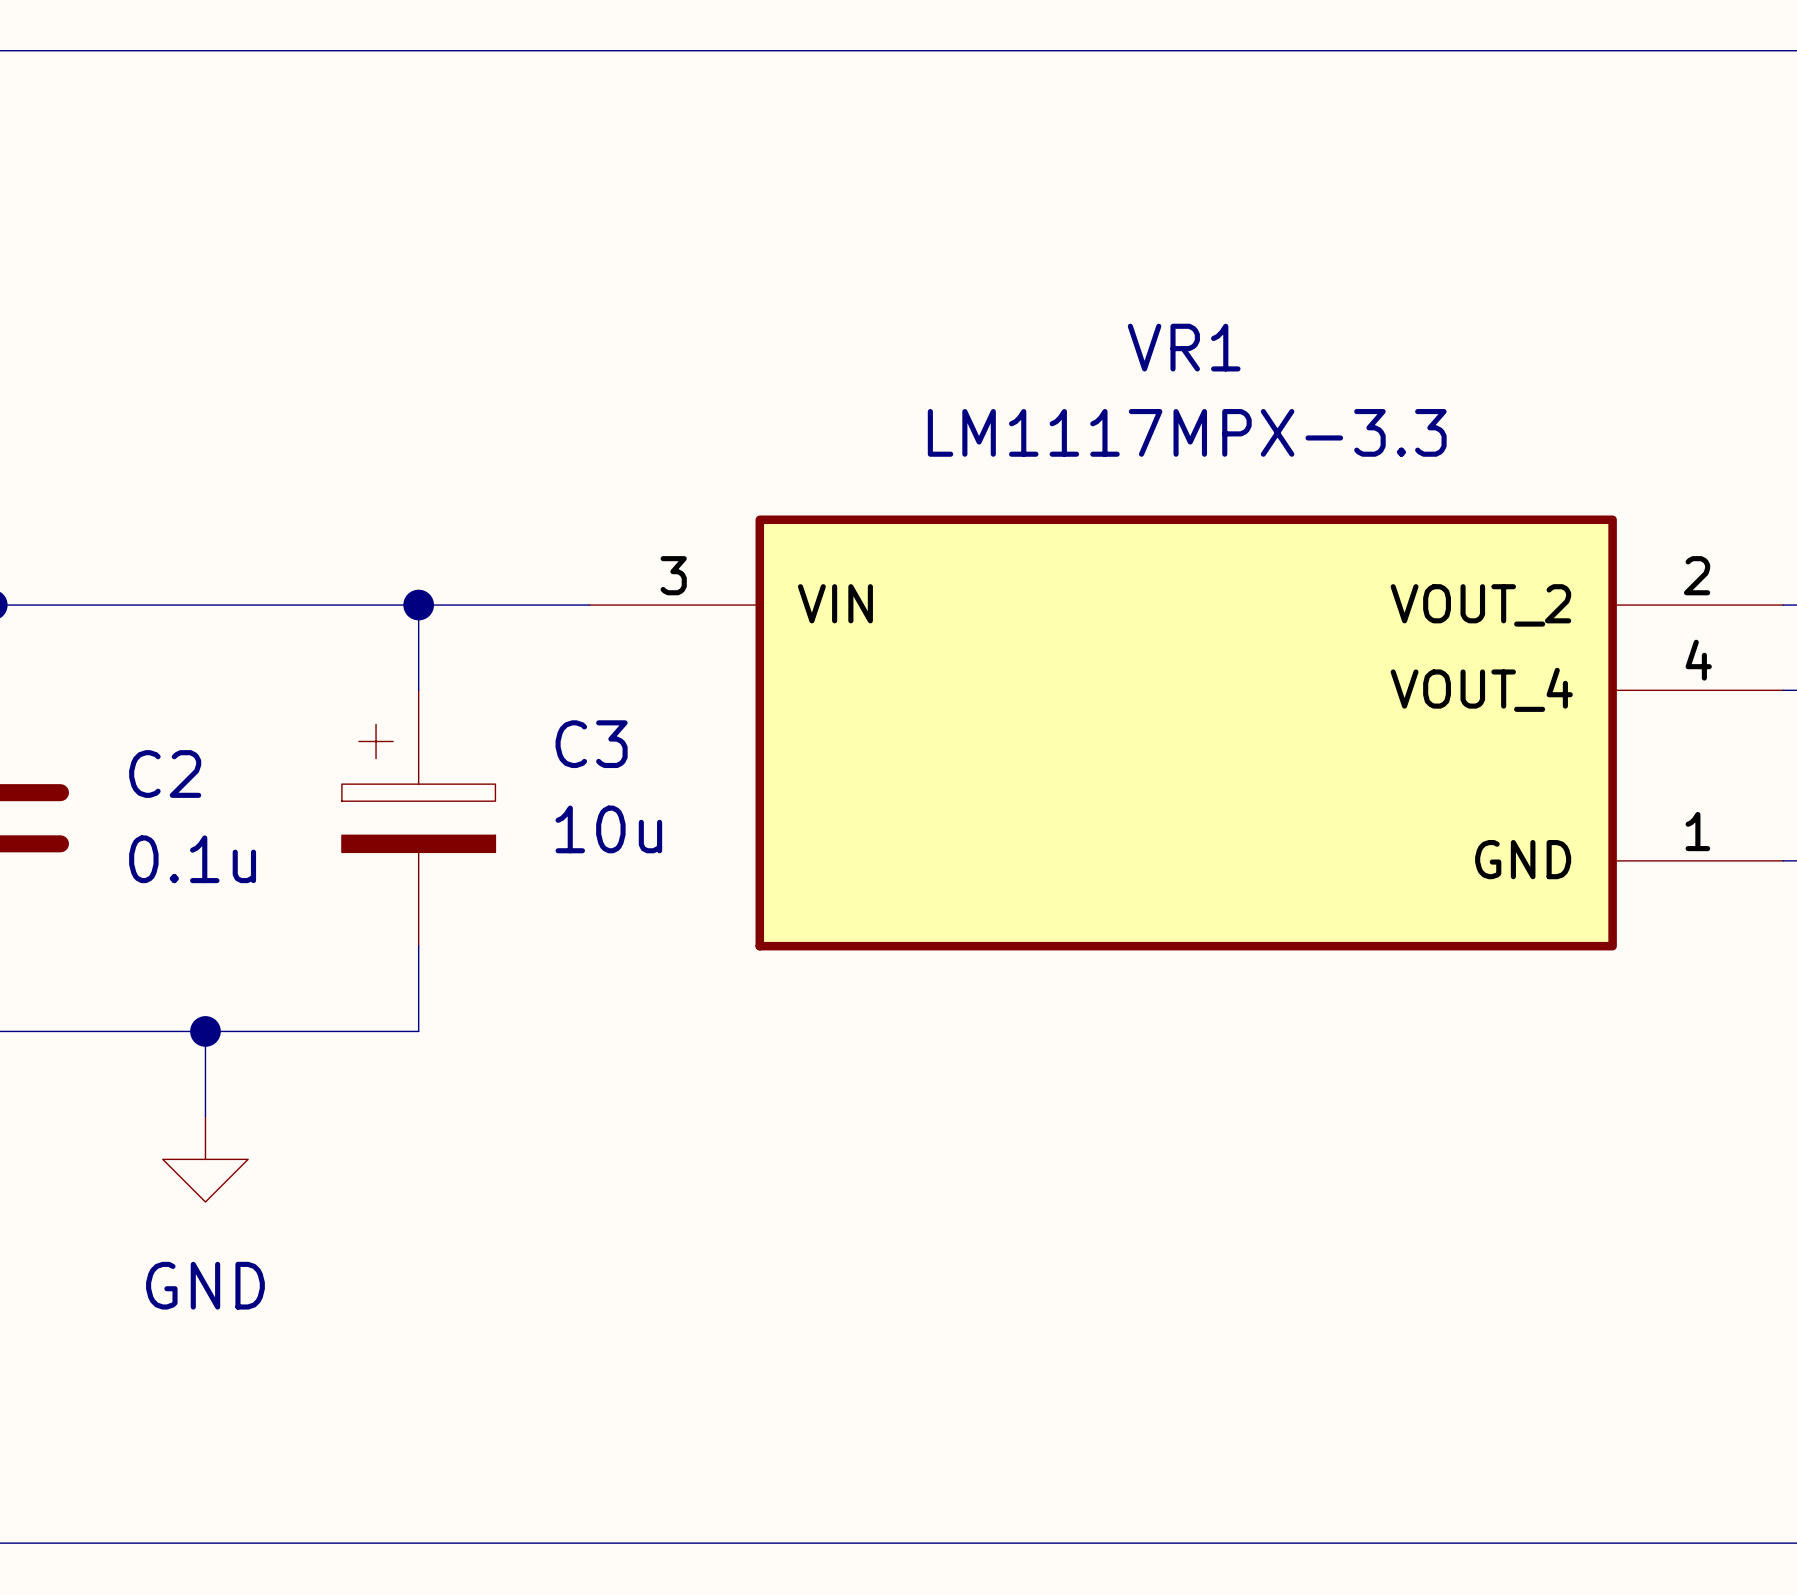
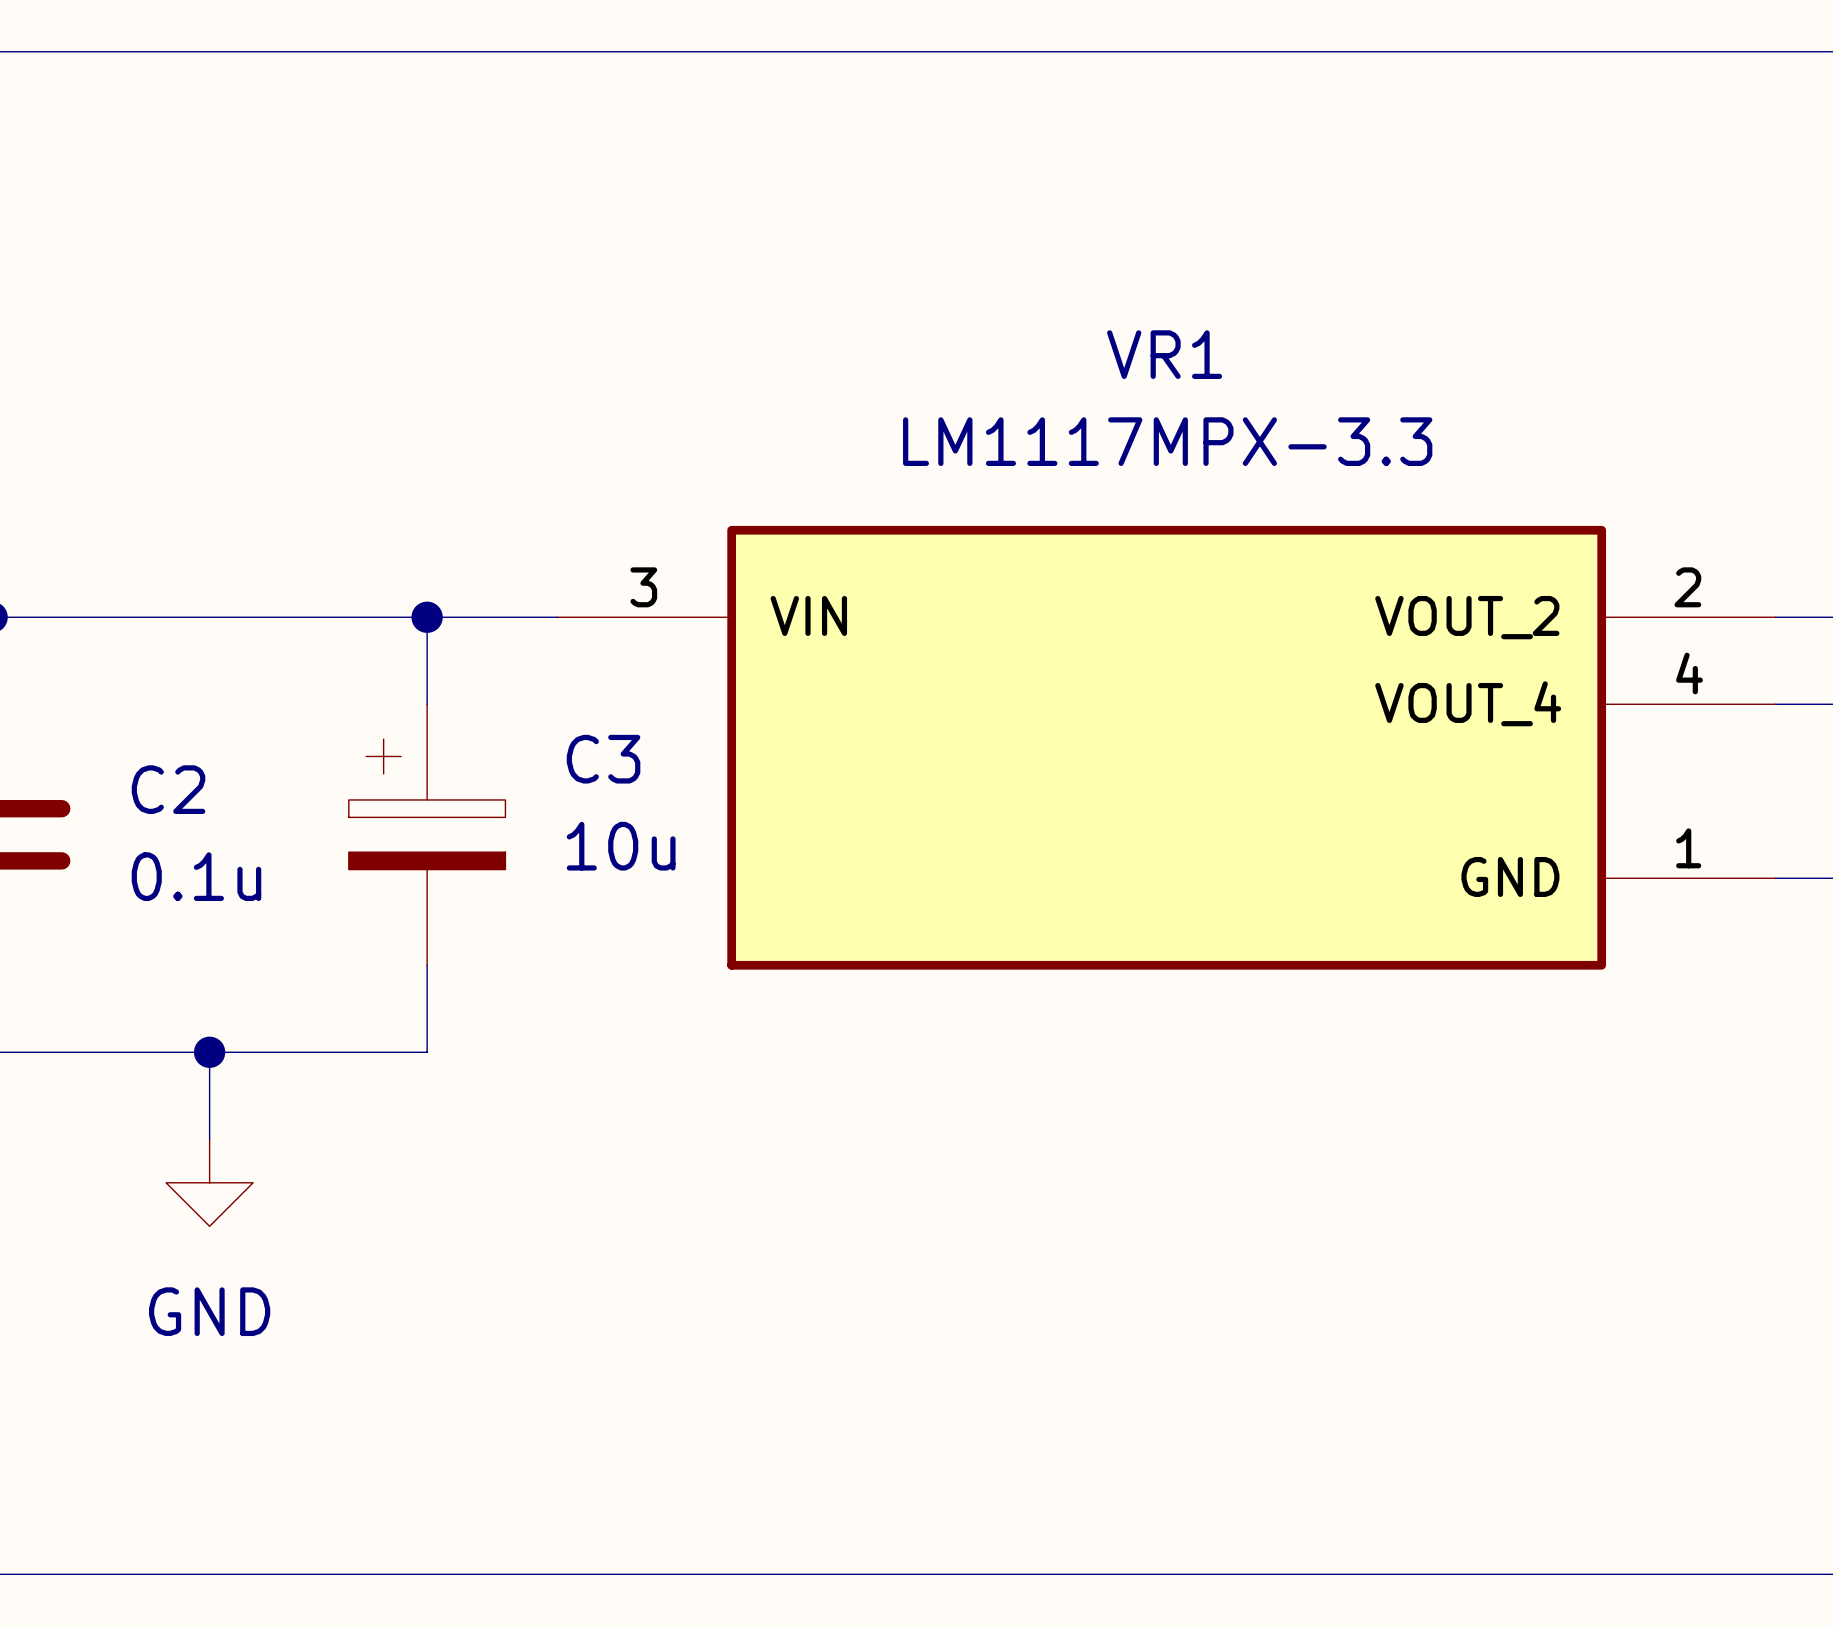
VR1 position: (1186, 732) -> (1166, 747)

